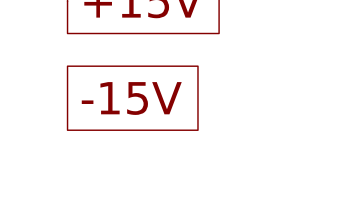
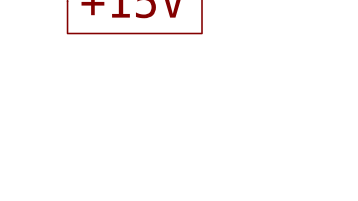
global label: -15V (131, 98) -> none

